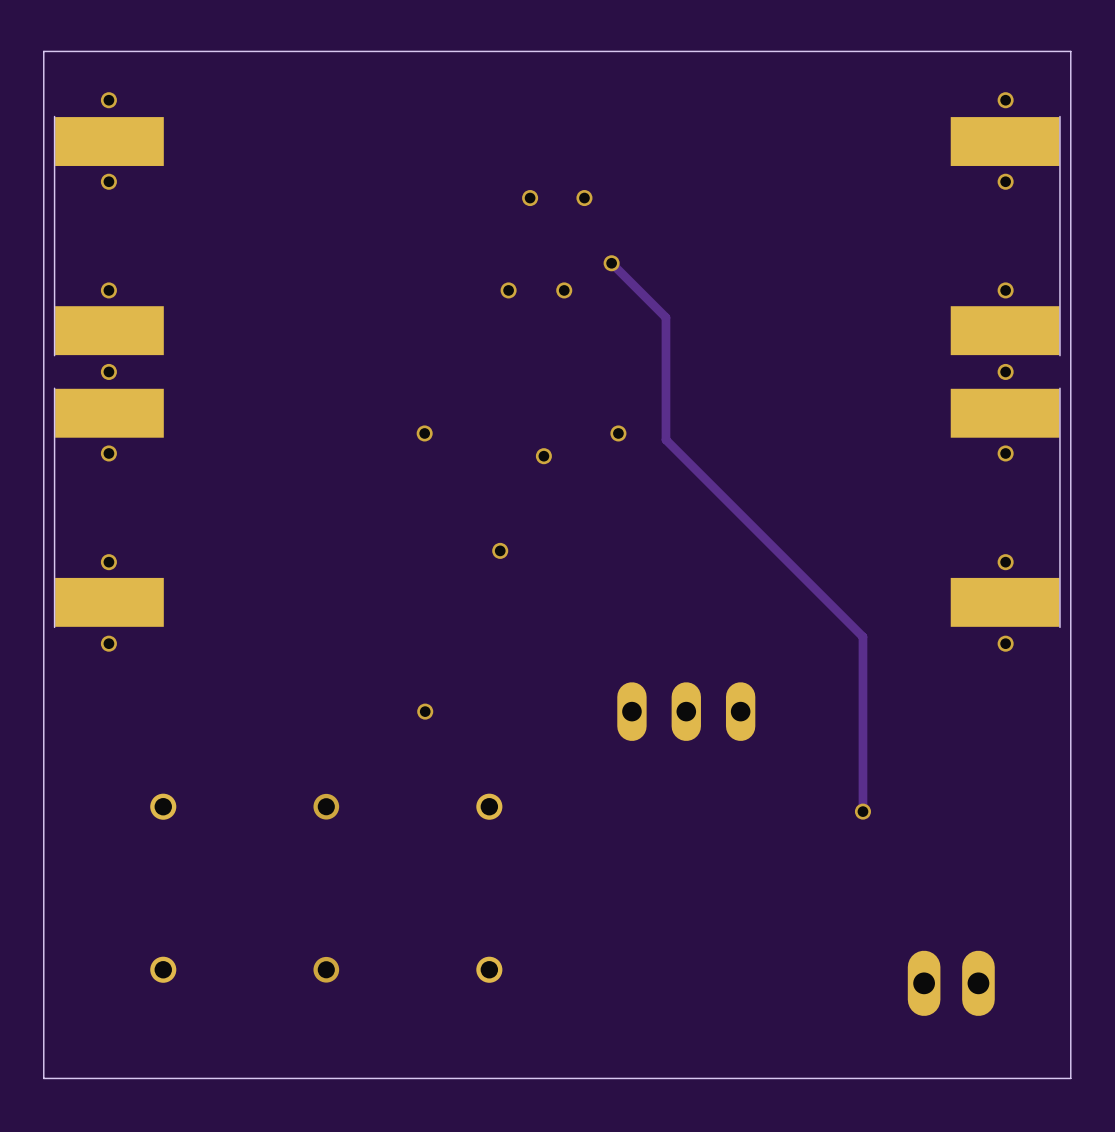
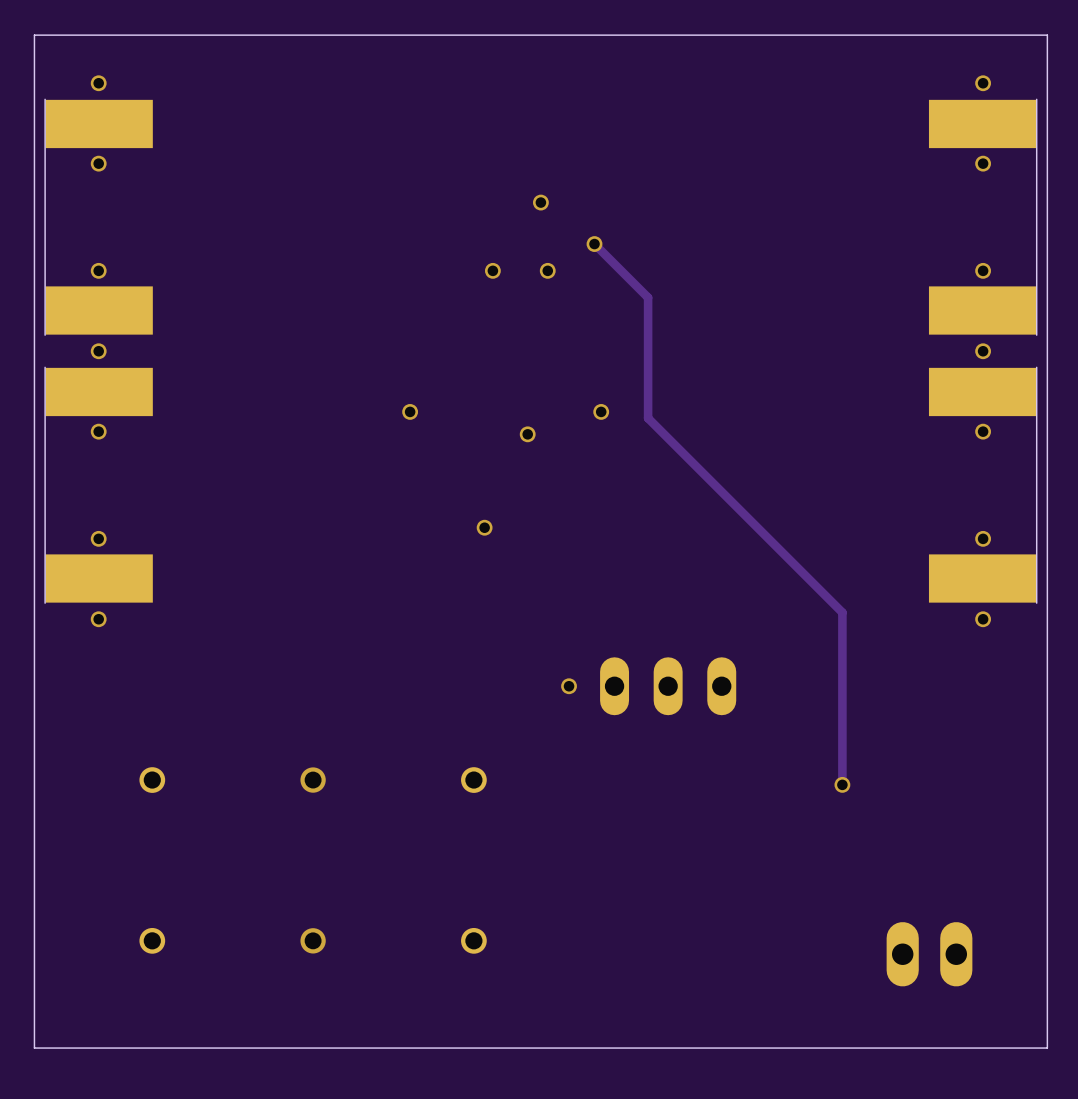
via: (530, 198) -> none
via: (584, 198) -> none
via: none -> (540, 202)
via: (425, 711) -> none
via: none -> (569, 686)

